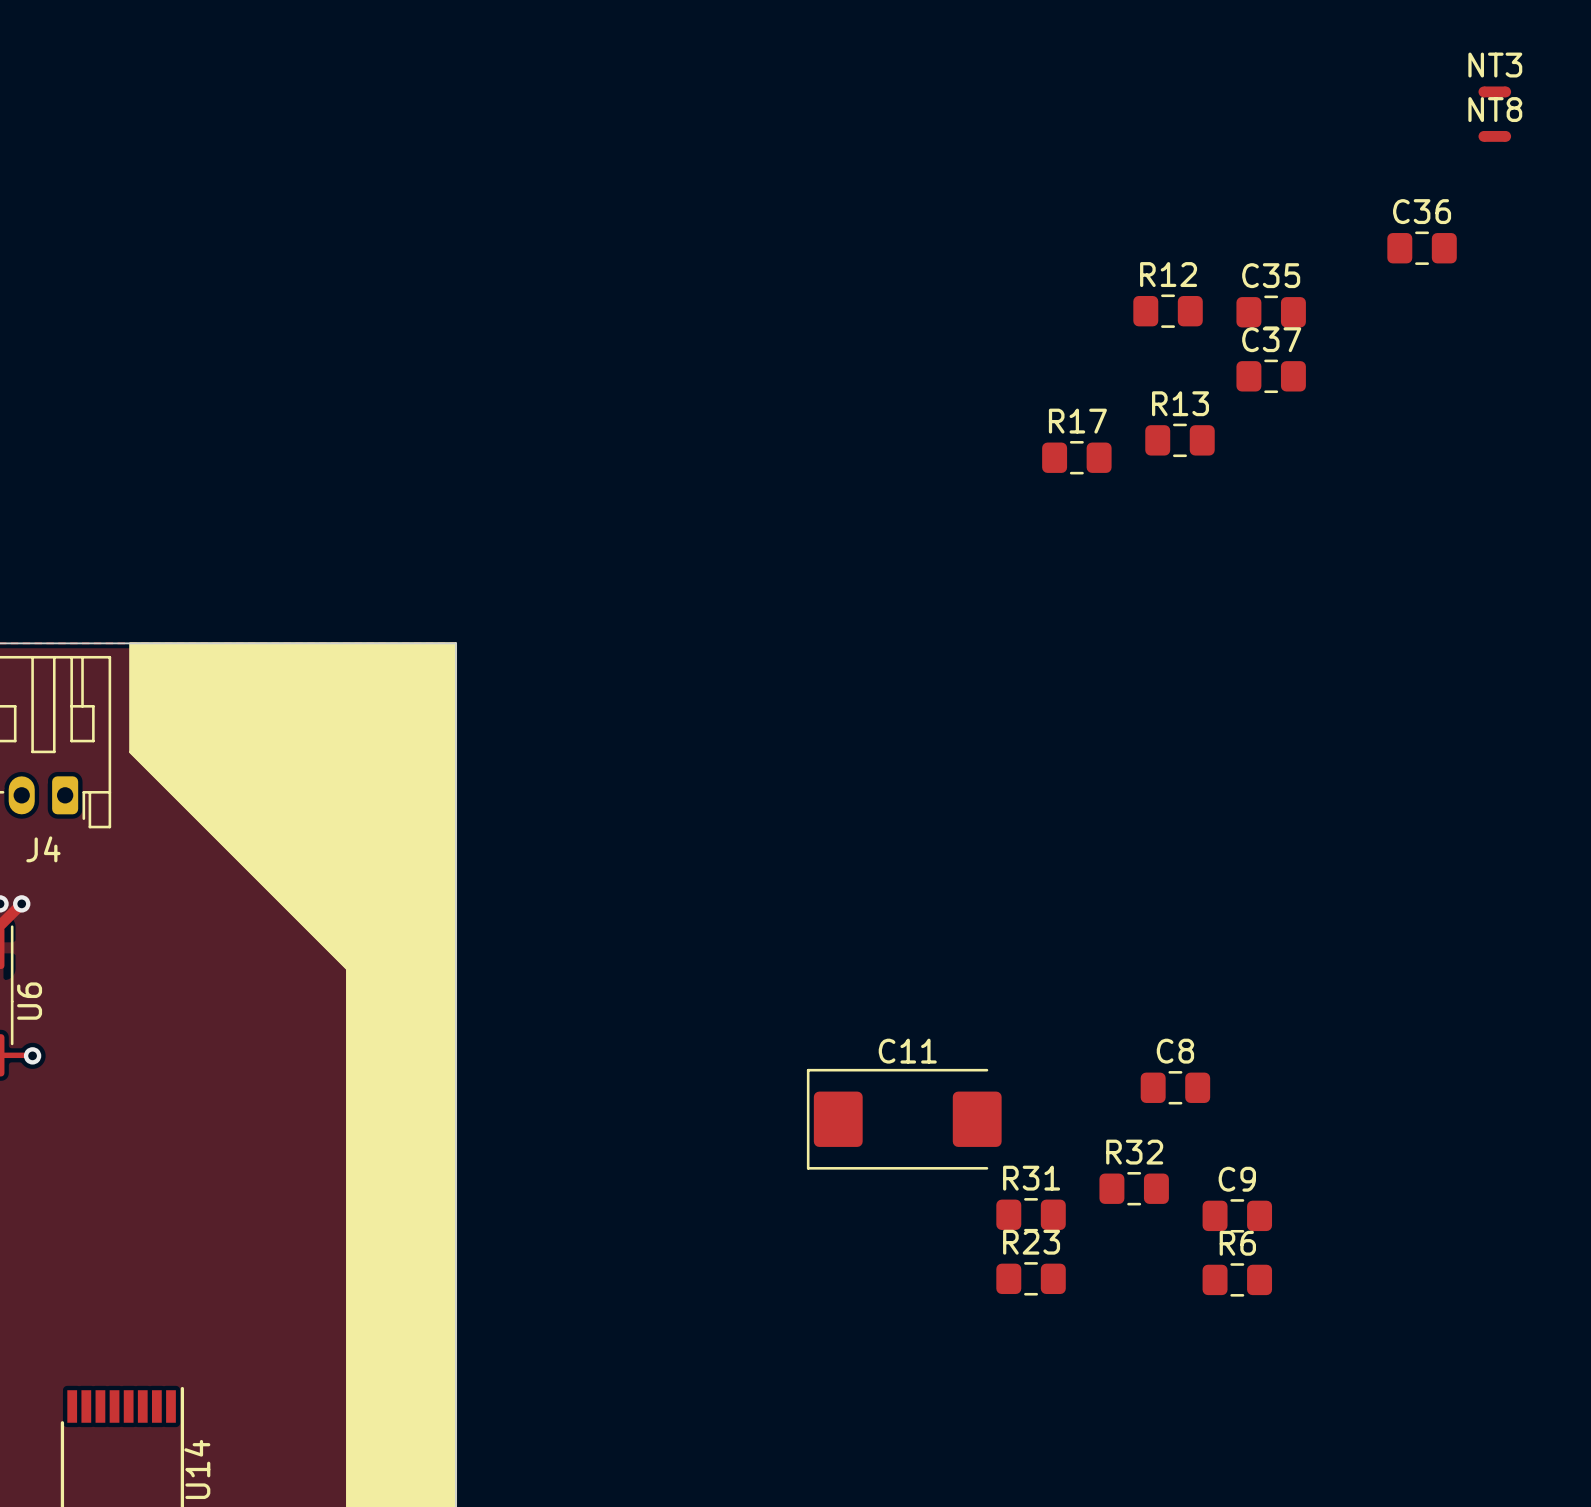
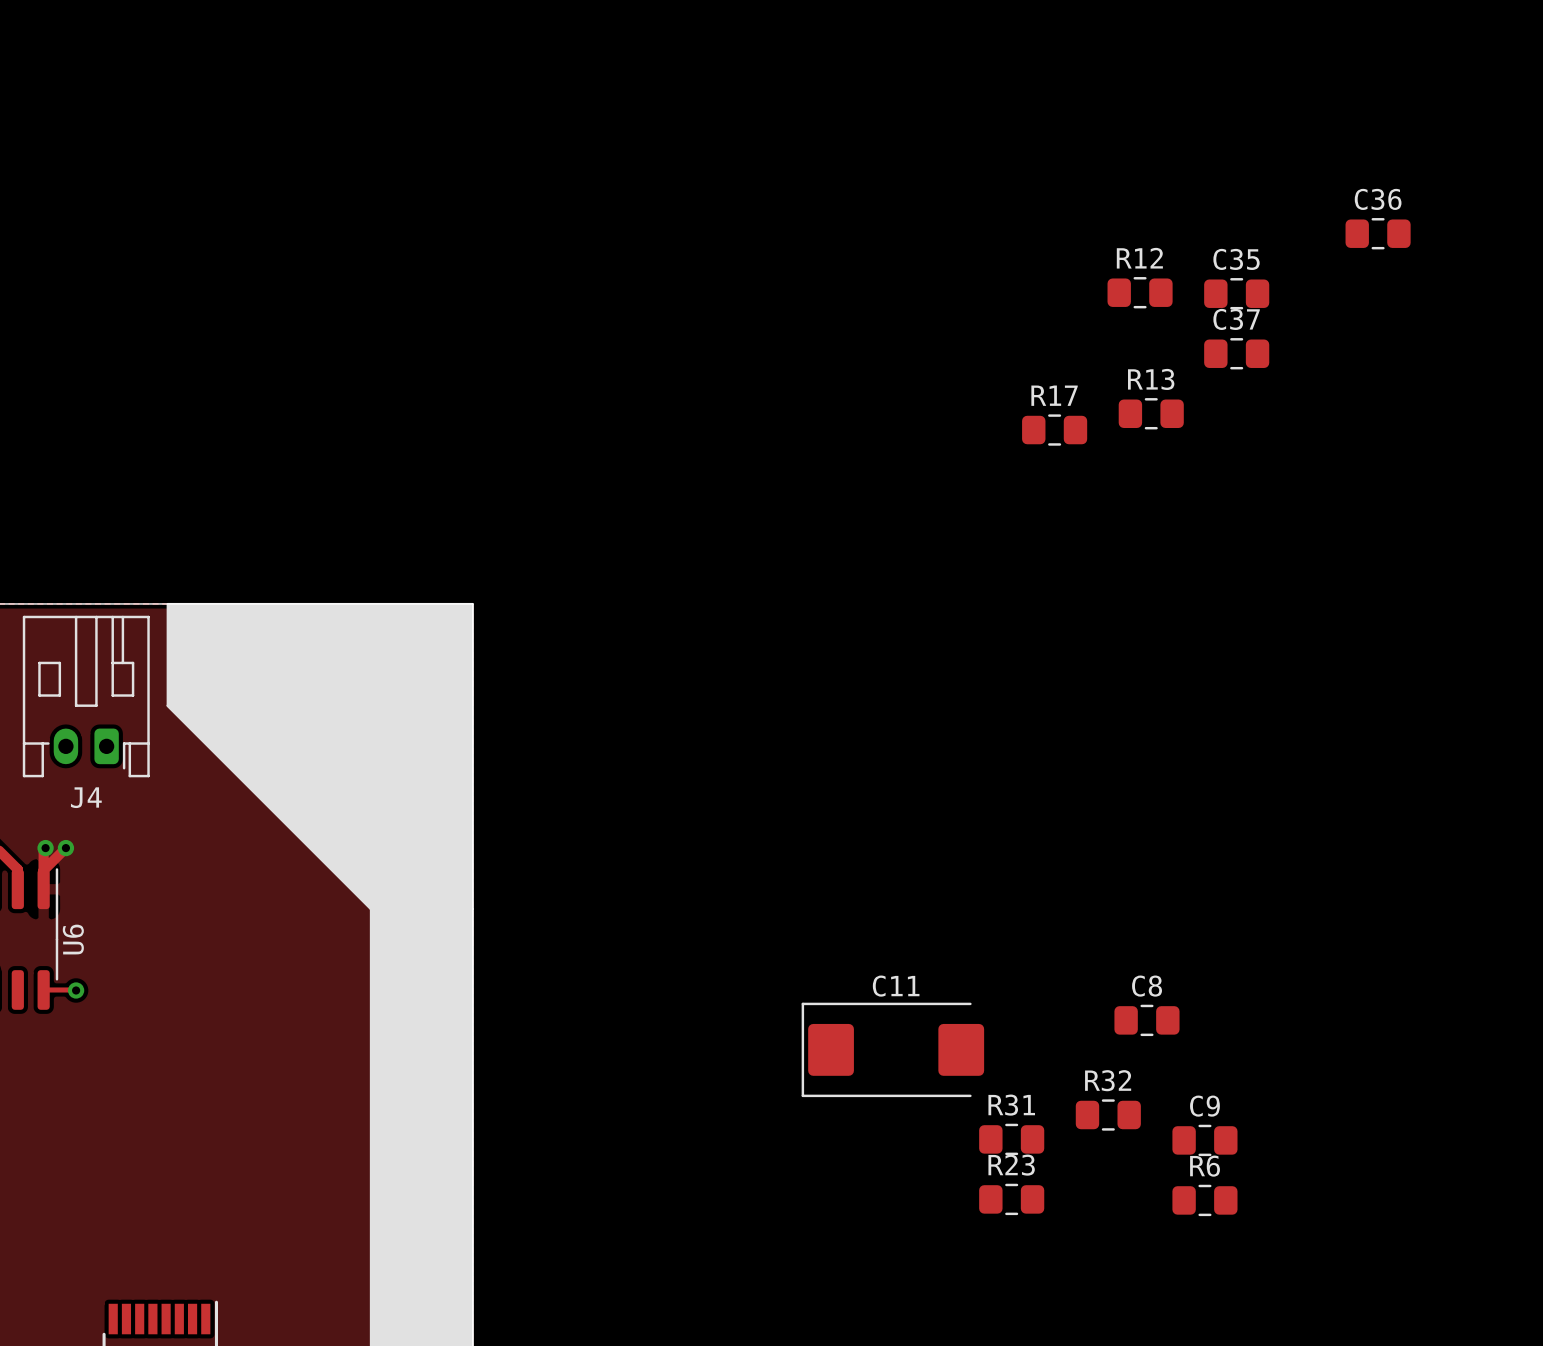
NT3: (1494, 91) -> none
NT8: (1494, 136) -> none

